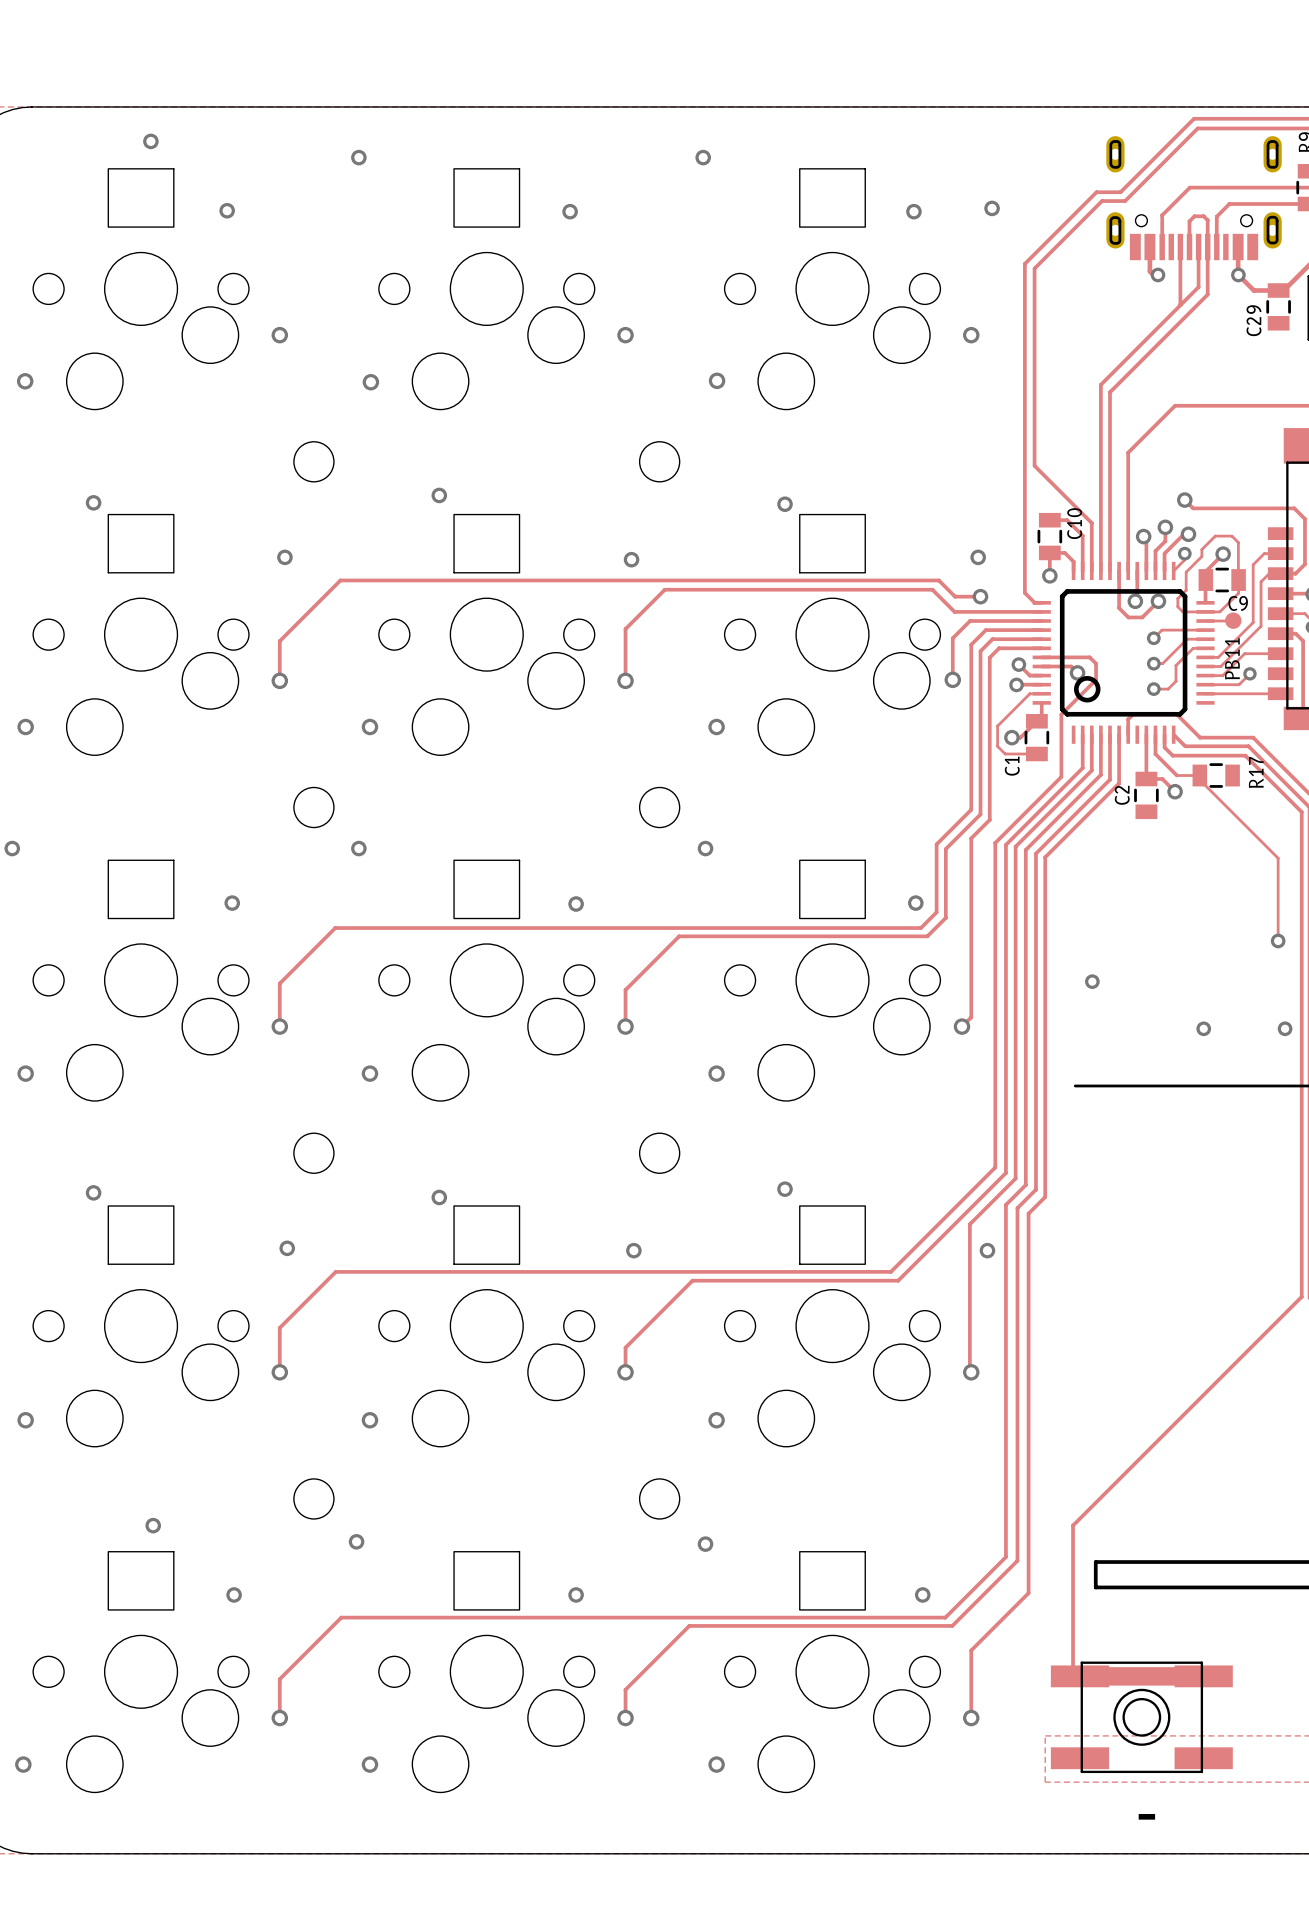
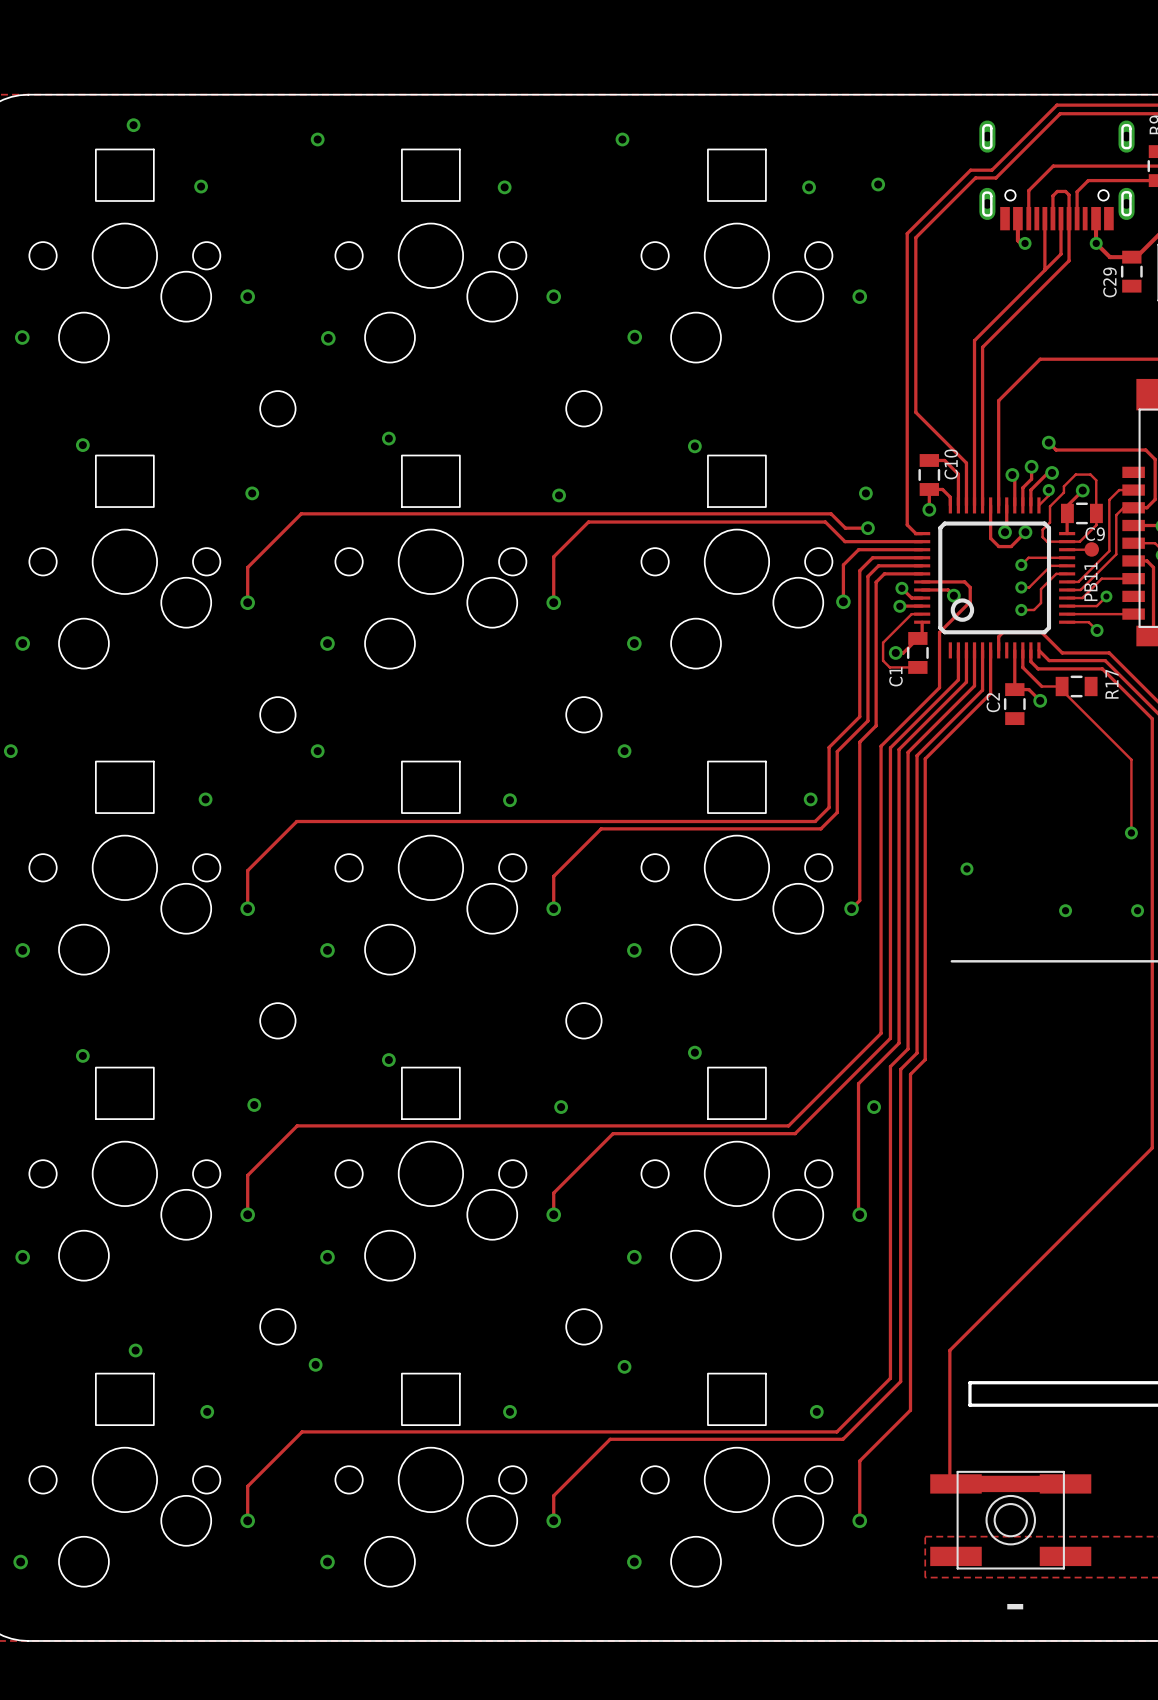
track: none -> (1067, 622) (1088, 622) (1097, 630)
via: none -> (1097, 630)

